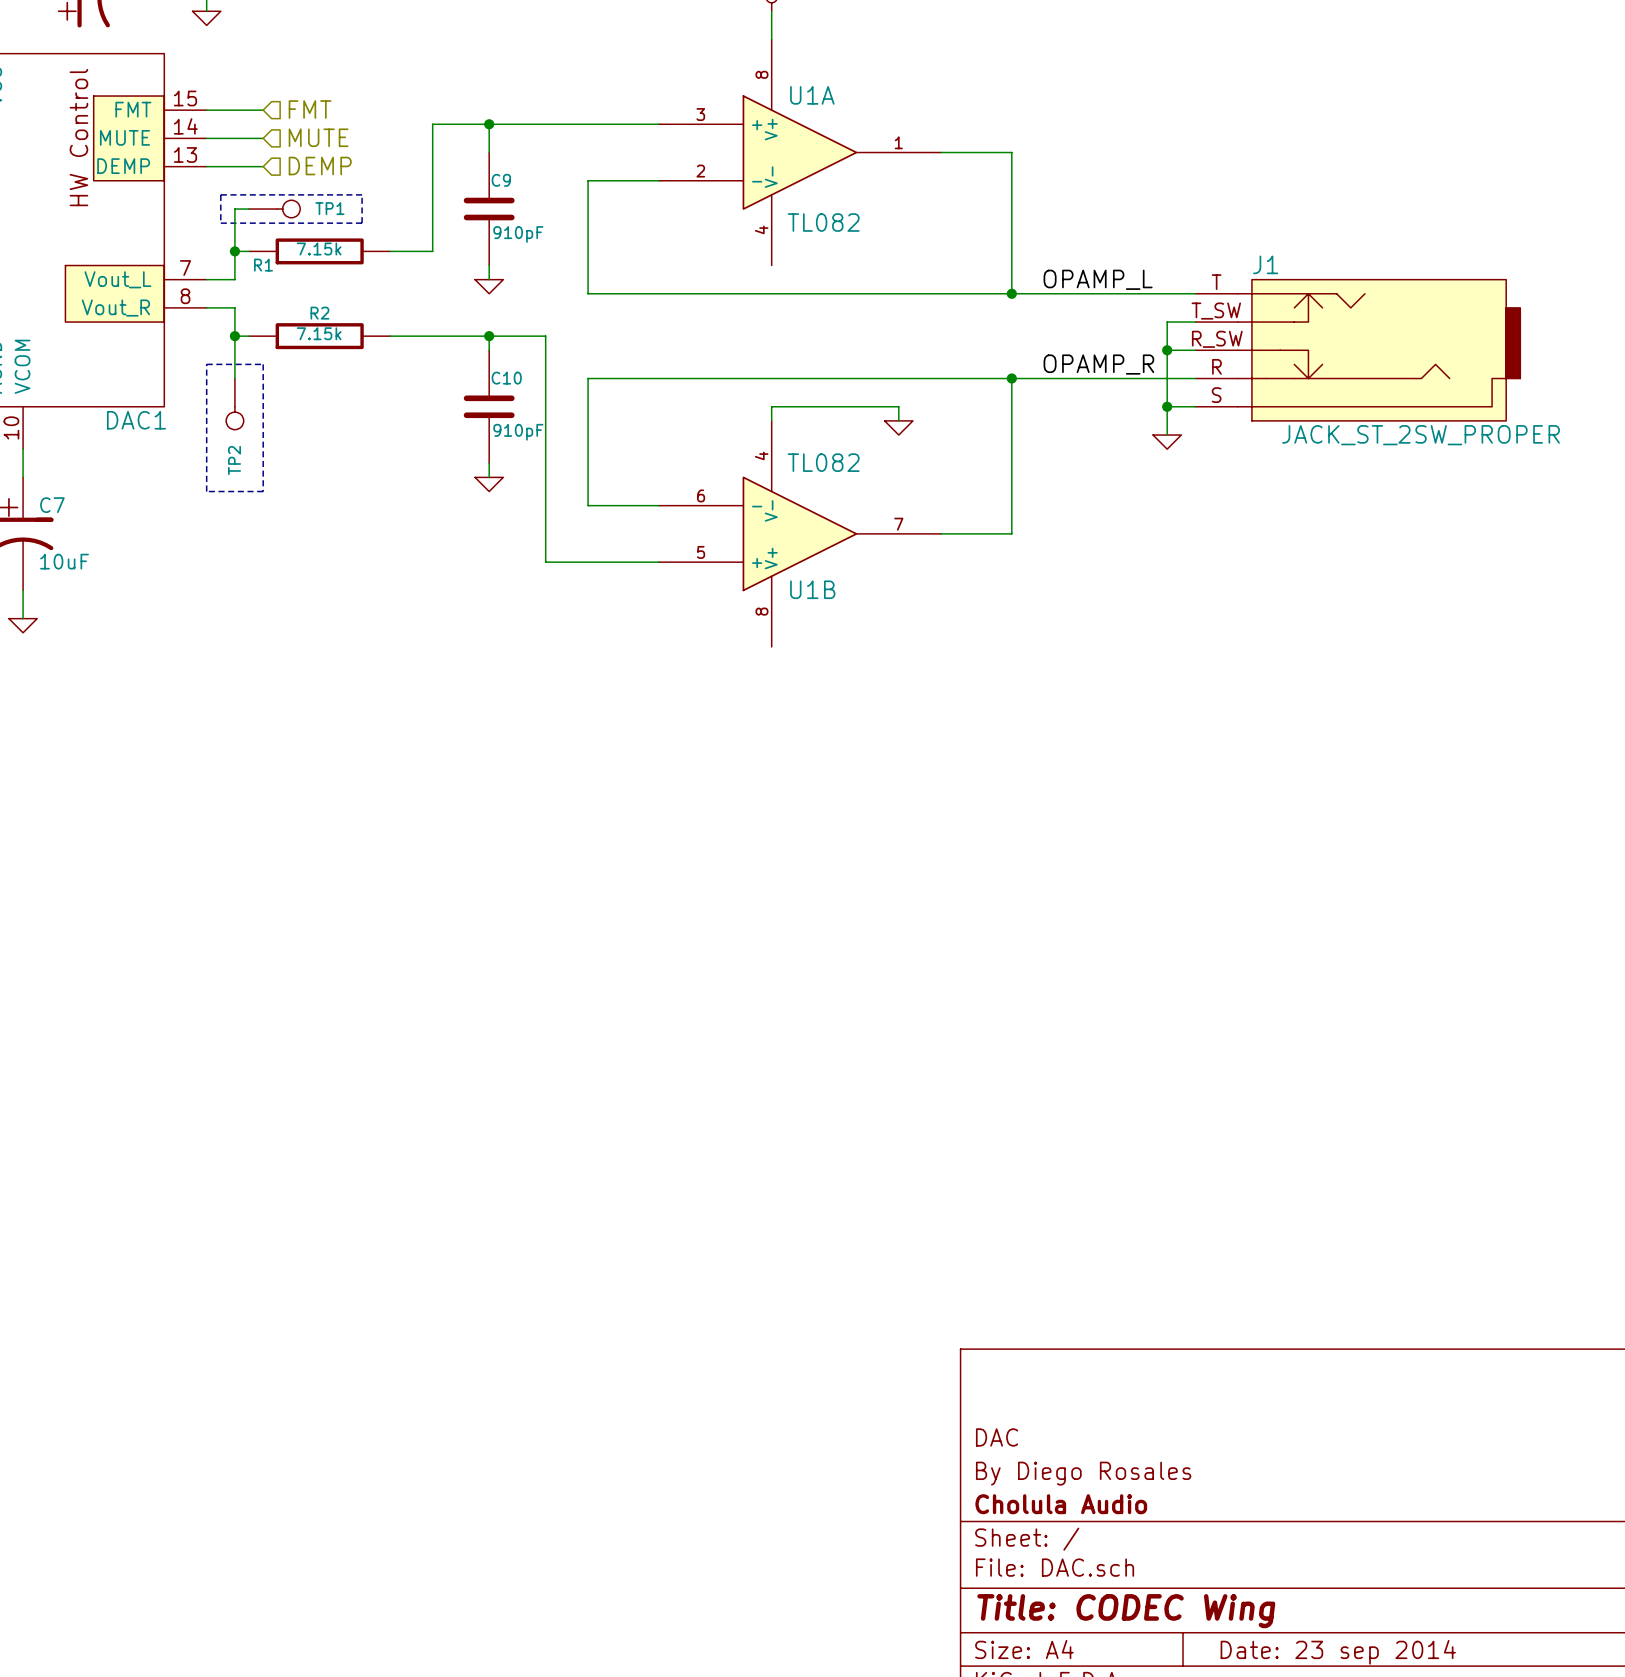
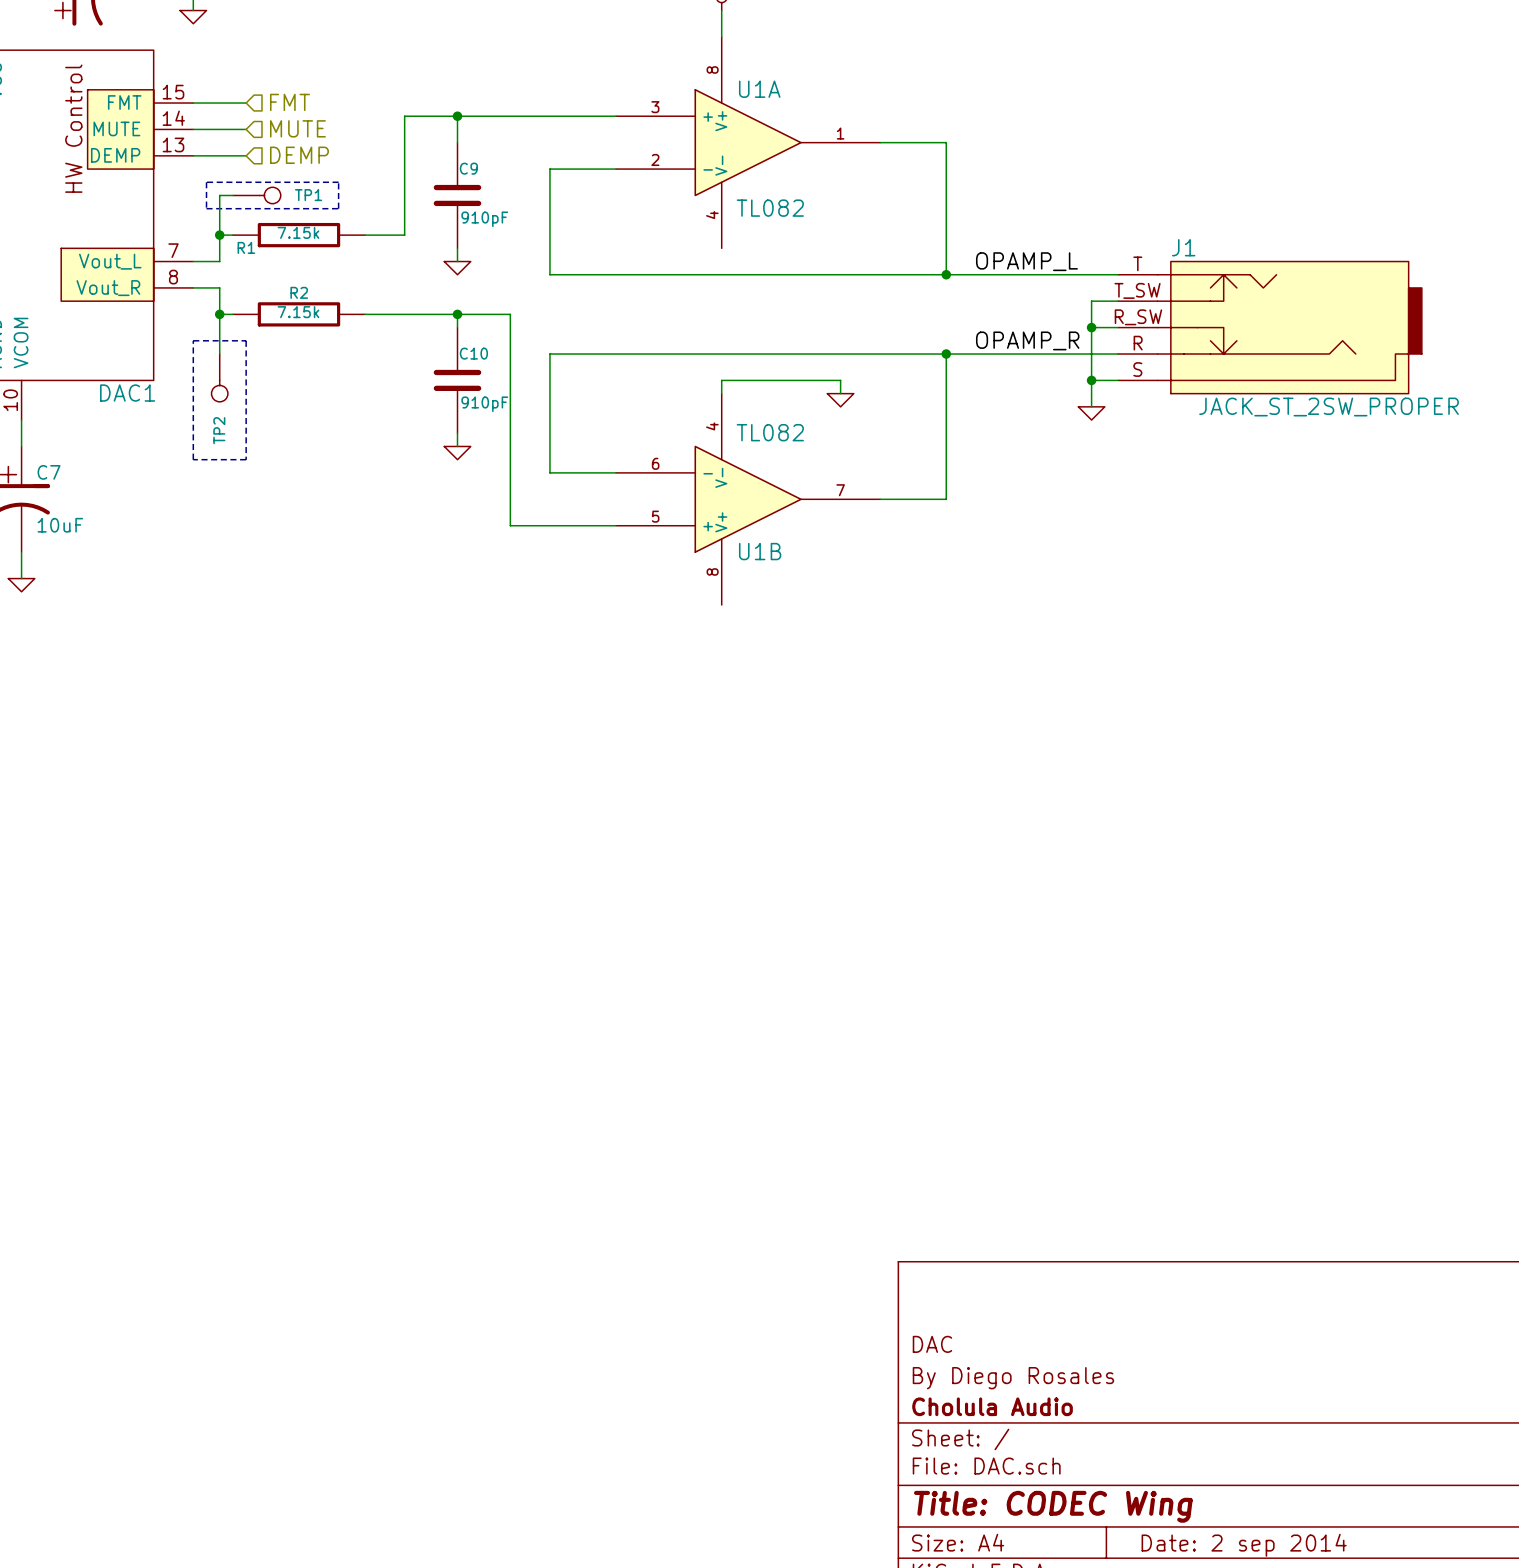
title block: Date: 23 sep 2014 (1338, 1652) -> Date: 2 sep 2014 (1244, 1545)

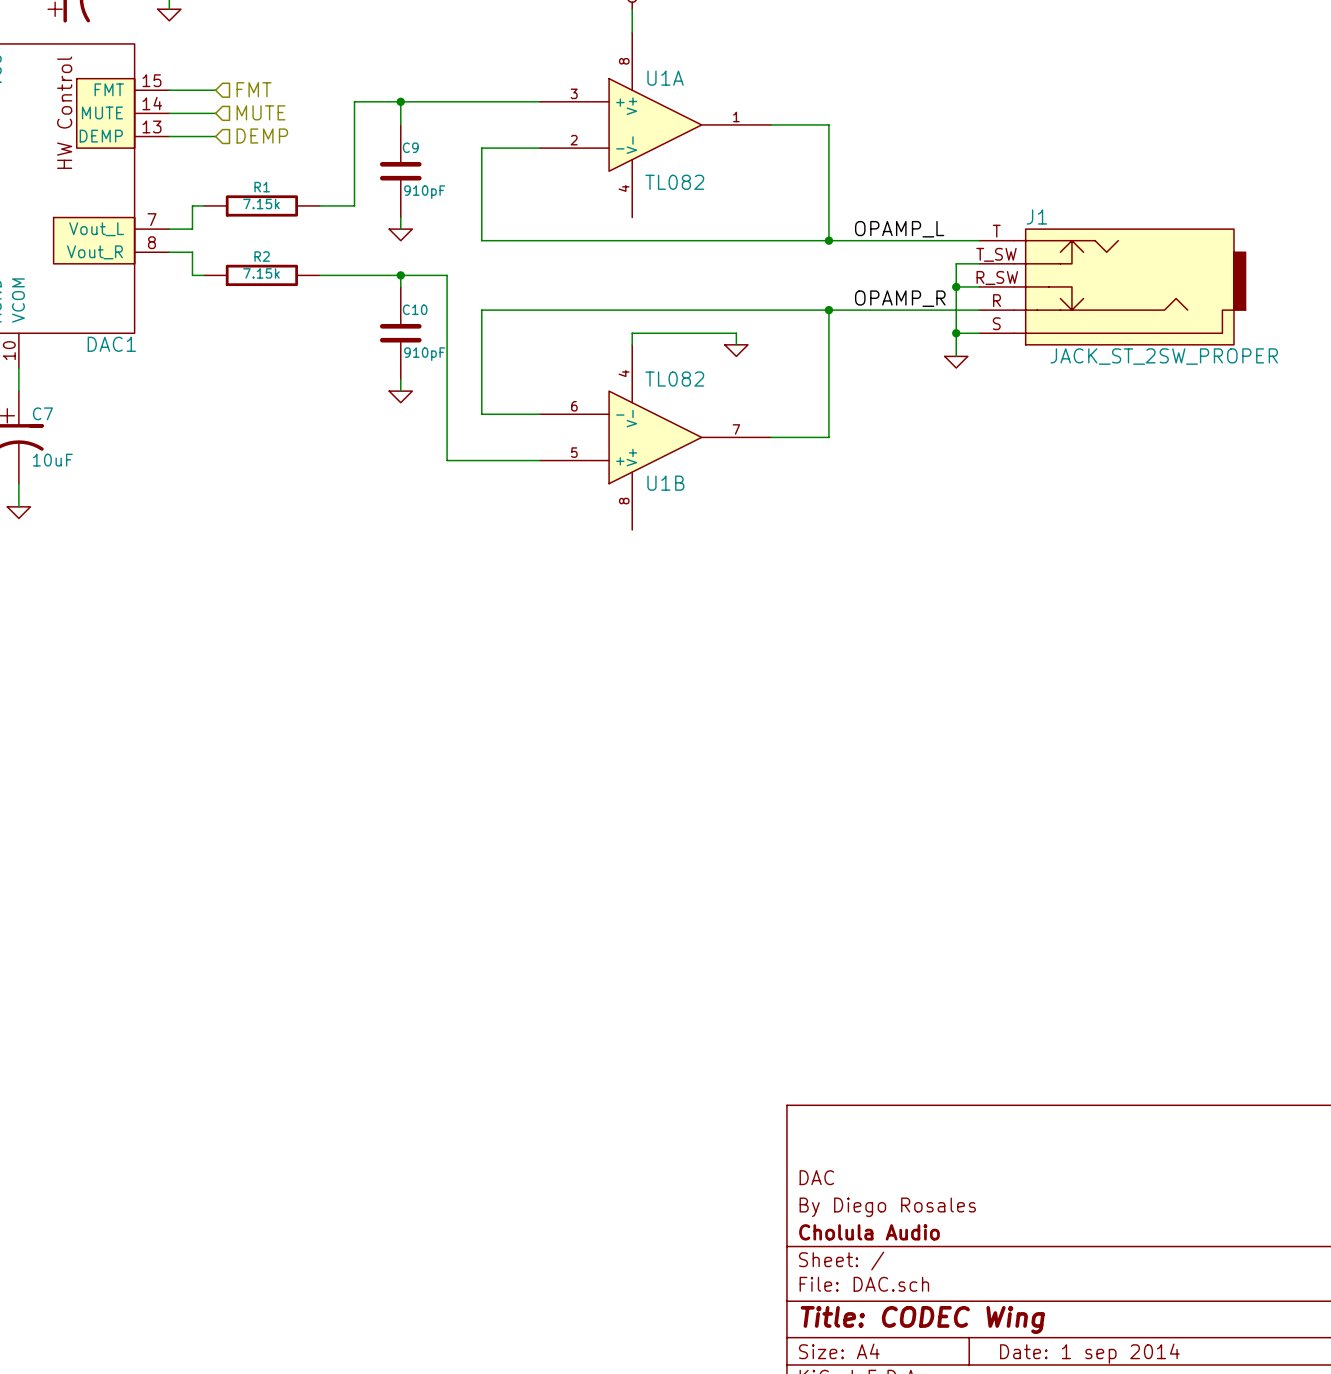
line: (206, 182) (206, 208) (338, 208) (338, 182) (206, 182) -> none
wire: (232, 195) (219, 195) (219, 235) -> none
TP1: (256, 195) -> none
junction: (219, 235) -> none
R1 name position: R1 (246, 247) -> R1 (262, 187)
wire: (219, 314) (219, 354) -> none
junction: (219, 314) -> none
line: (193, 340) (246, 340) (246, 459) (193, 459) (193, 340) -> none
TP2: (219, 377) -> none
title block: Date: 2 sep 2014 (1244, 1545) -> Date: 1 sep 2014 (1089, 1353)

